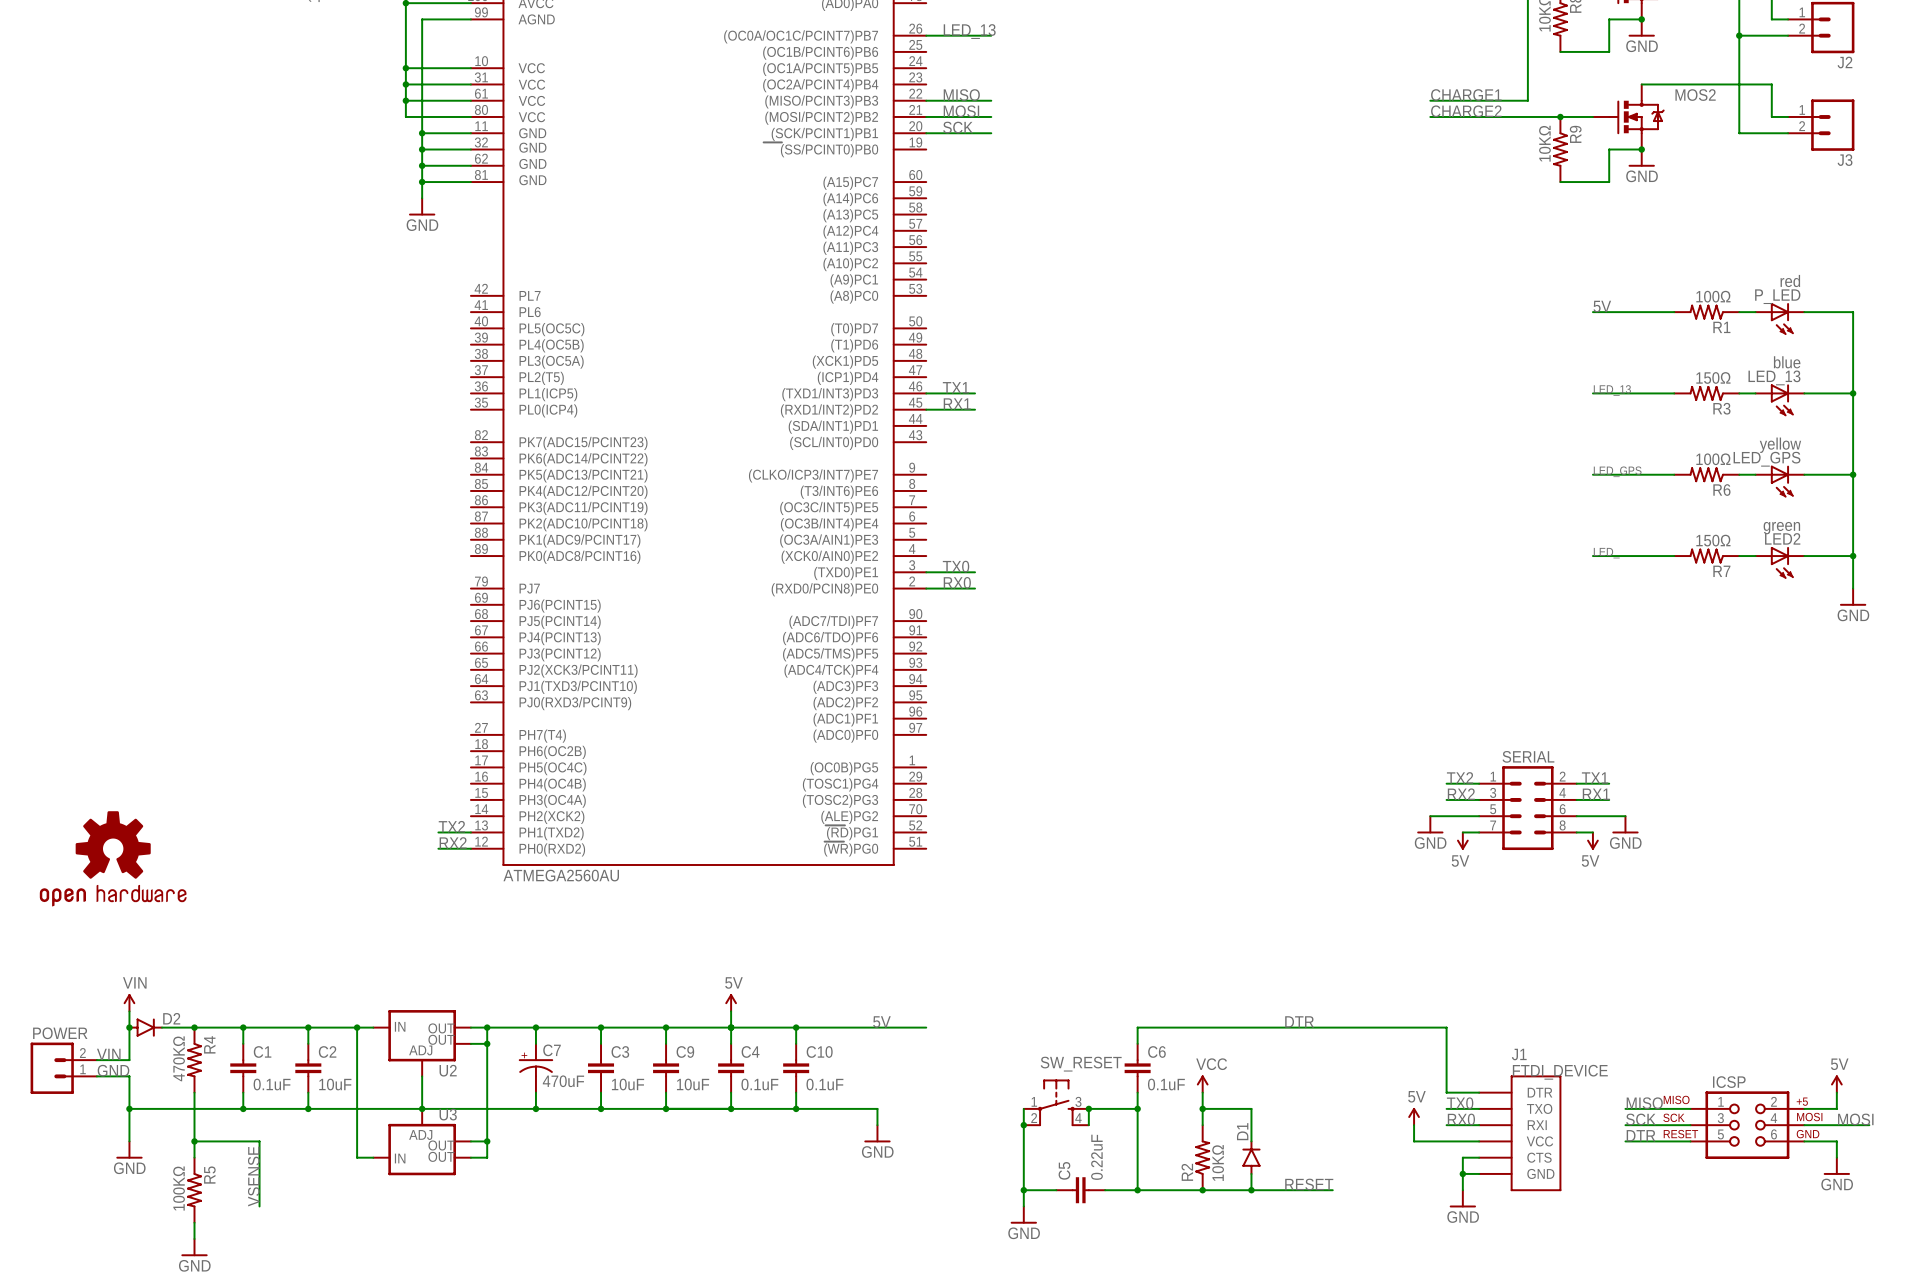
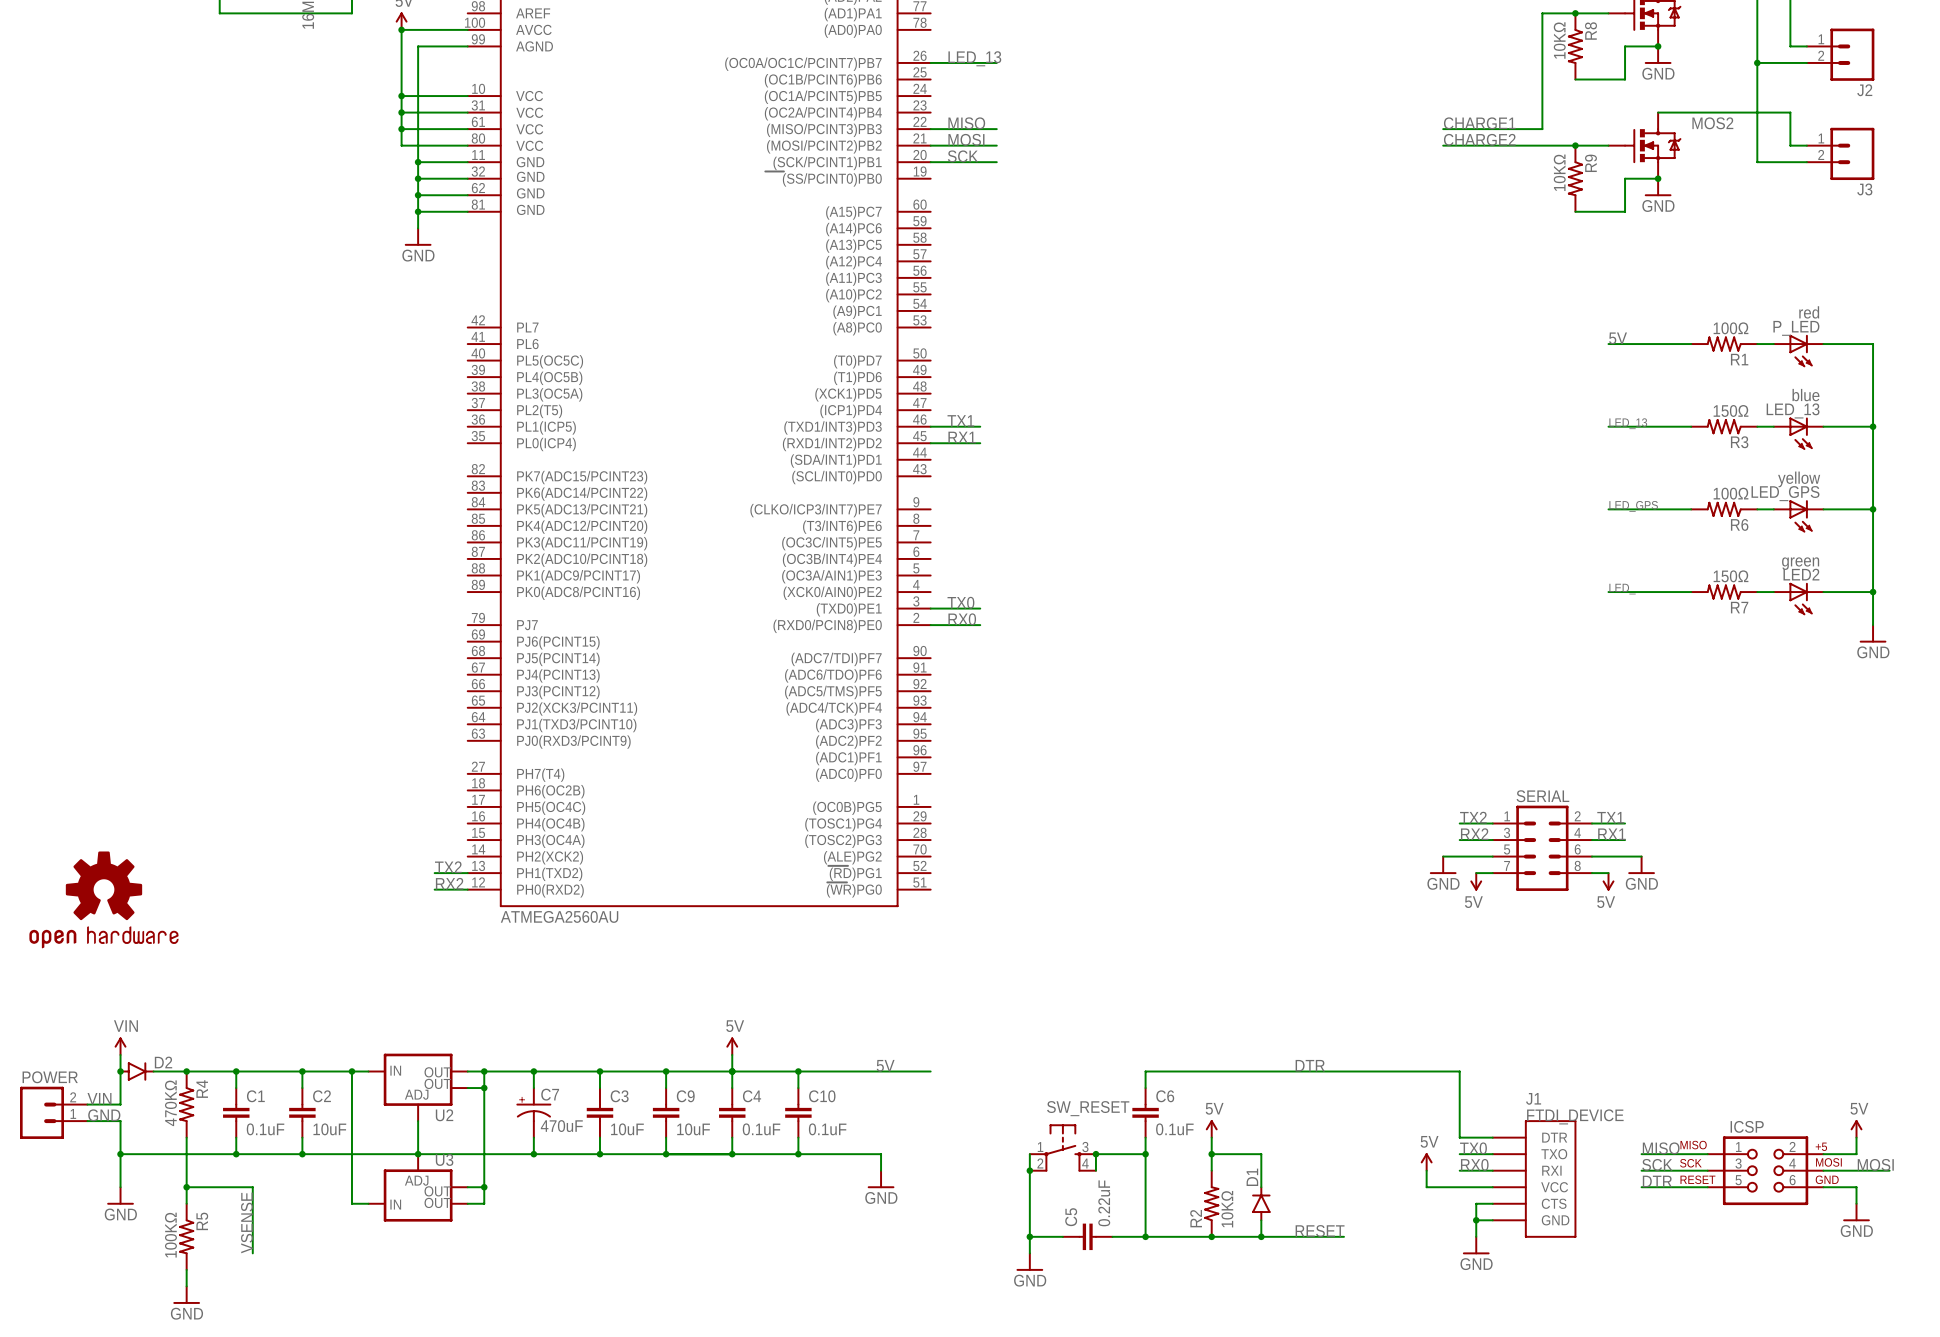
power symbol: VCC (1202, 1084) -> 5V (1211, 1128)

